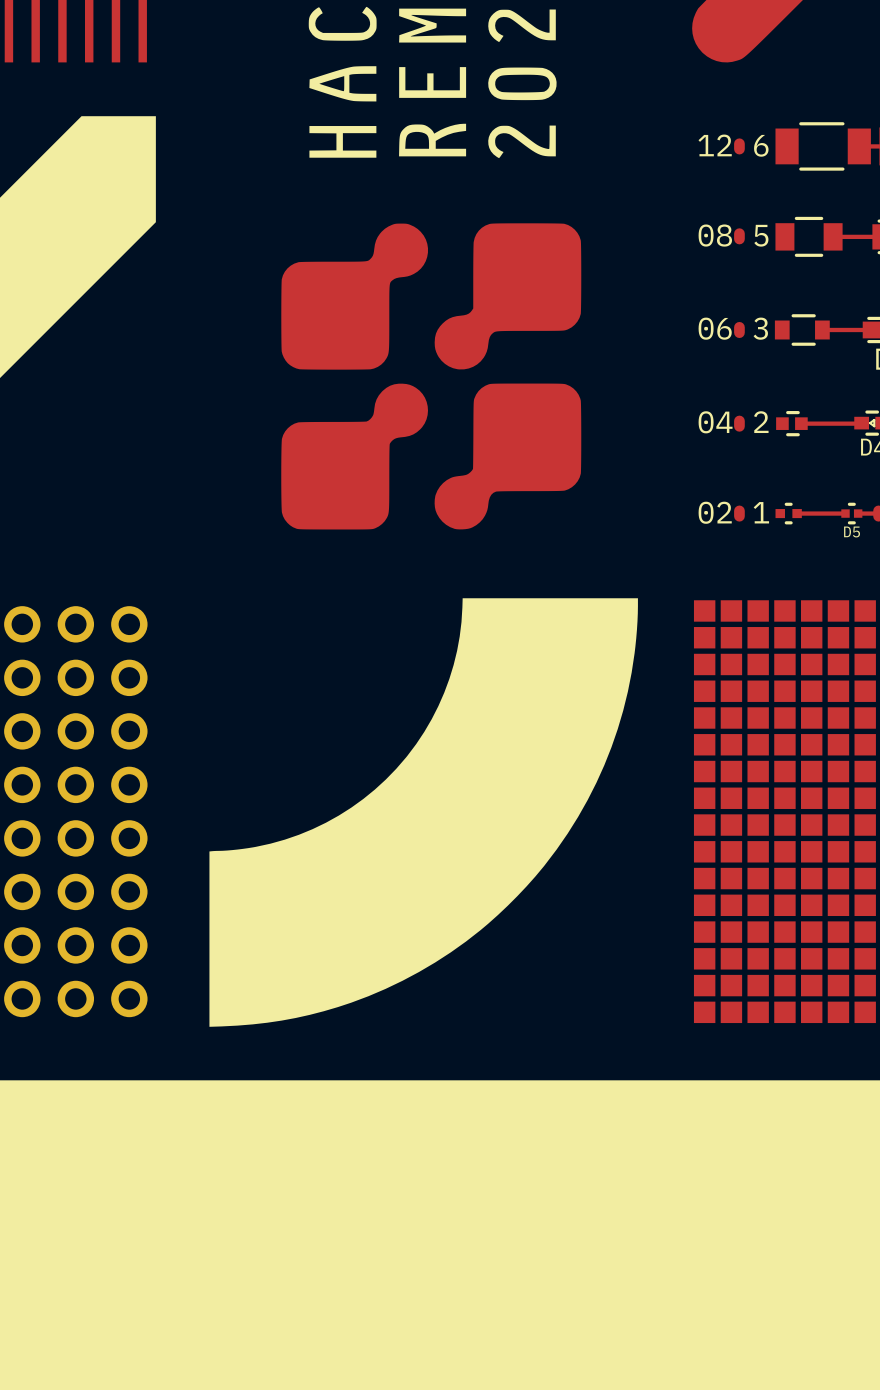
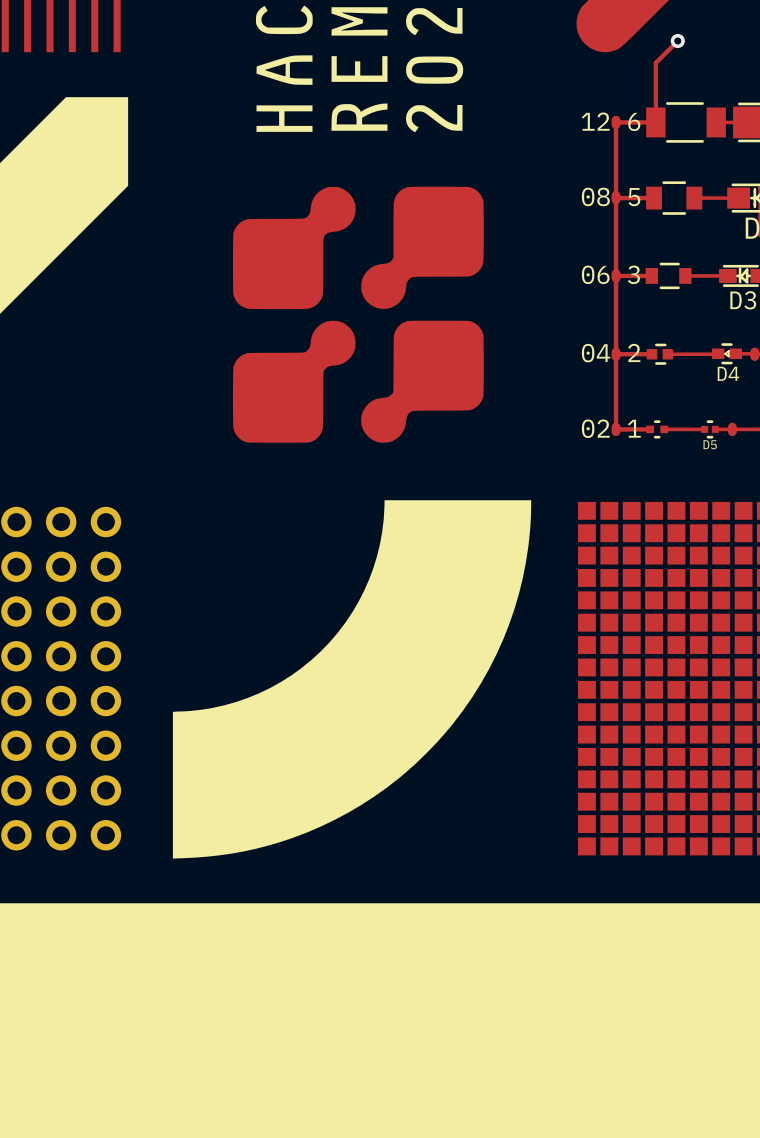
track: none -> (677, 41) (655, 62) (655, 122) (616, 122) (616, 429) (650, 429)
via: none -> (677, 41)
track: none -> (616, 198) (654, 198)
track: none -> (616, 275) (651, 275)
track: none -> (616, 354) (651, 354)

